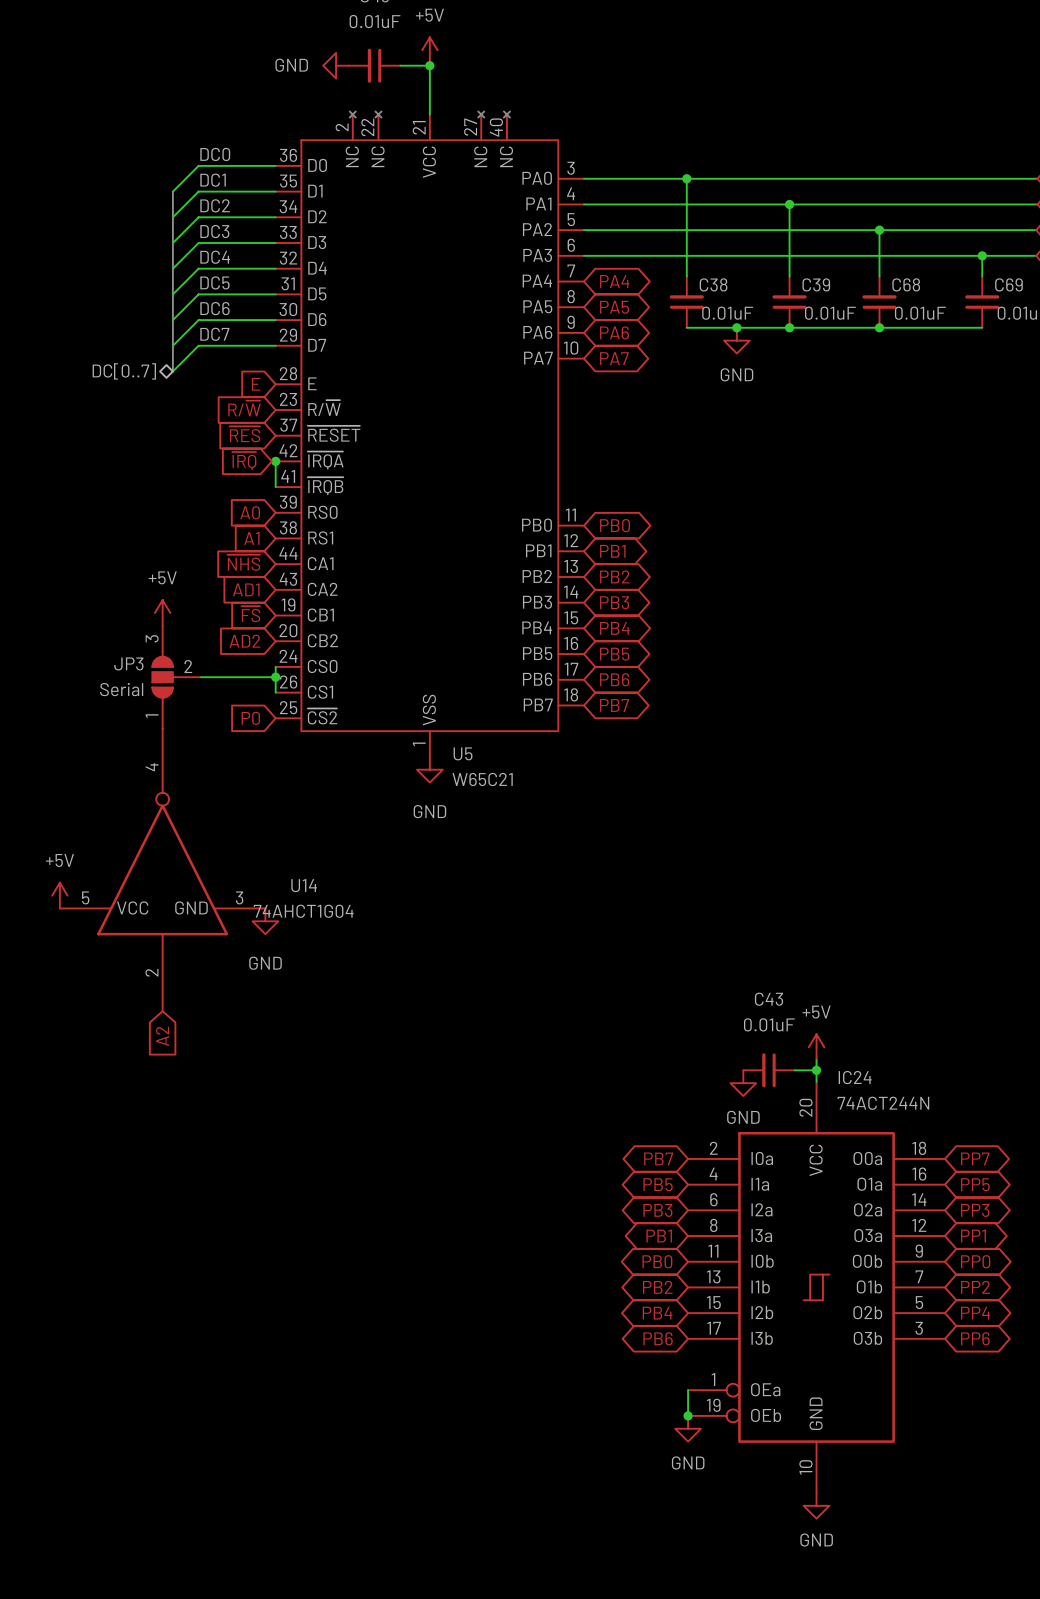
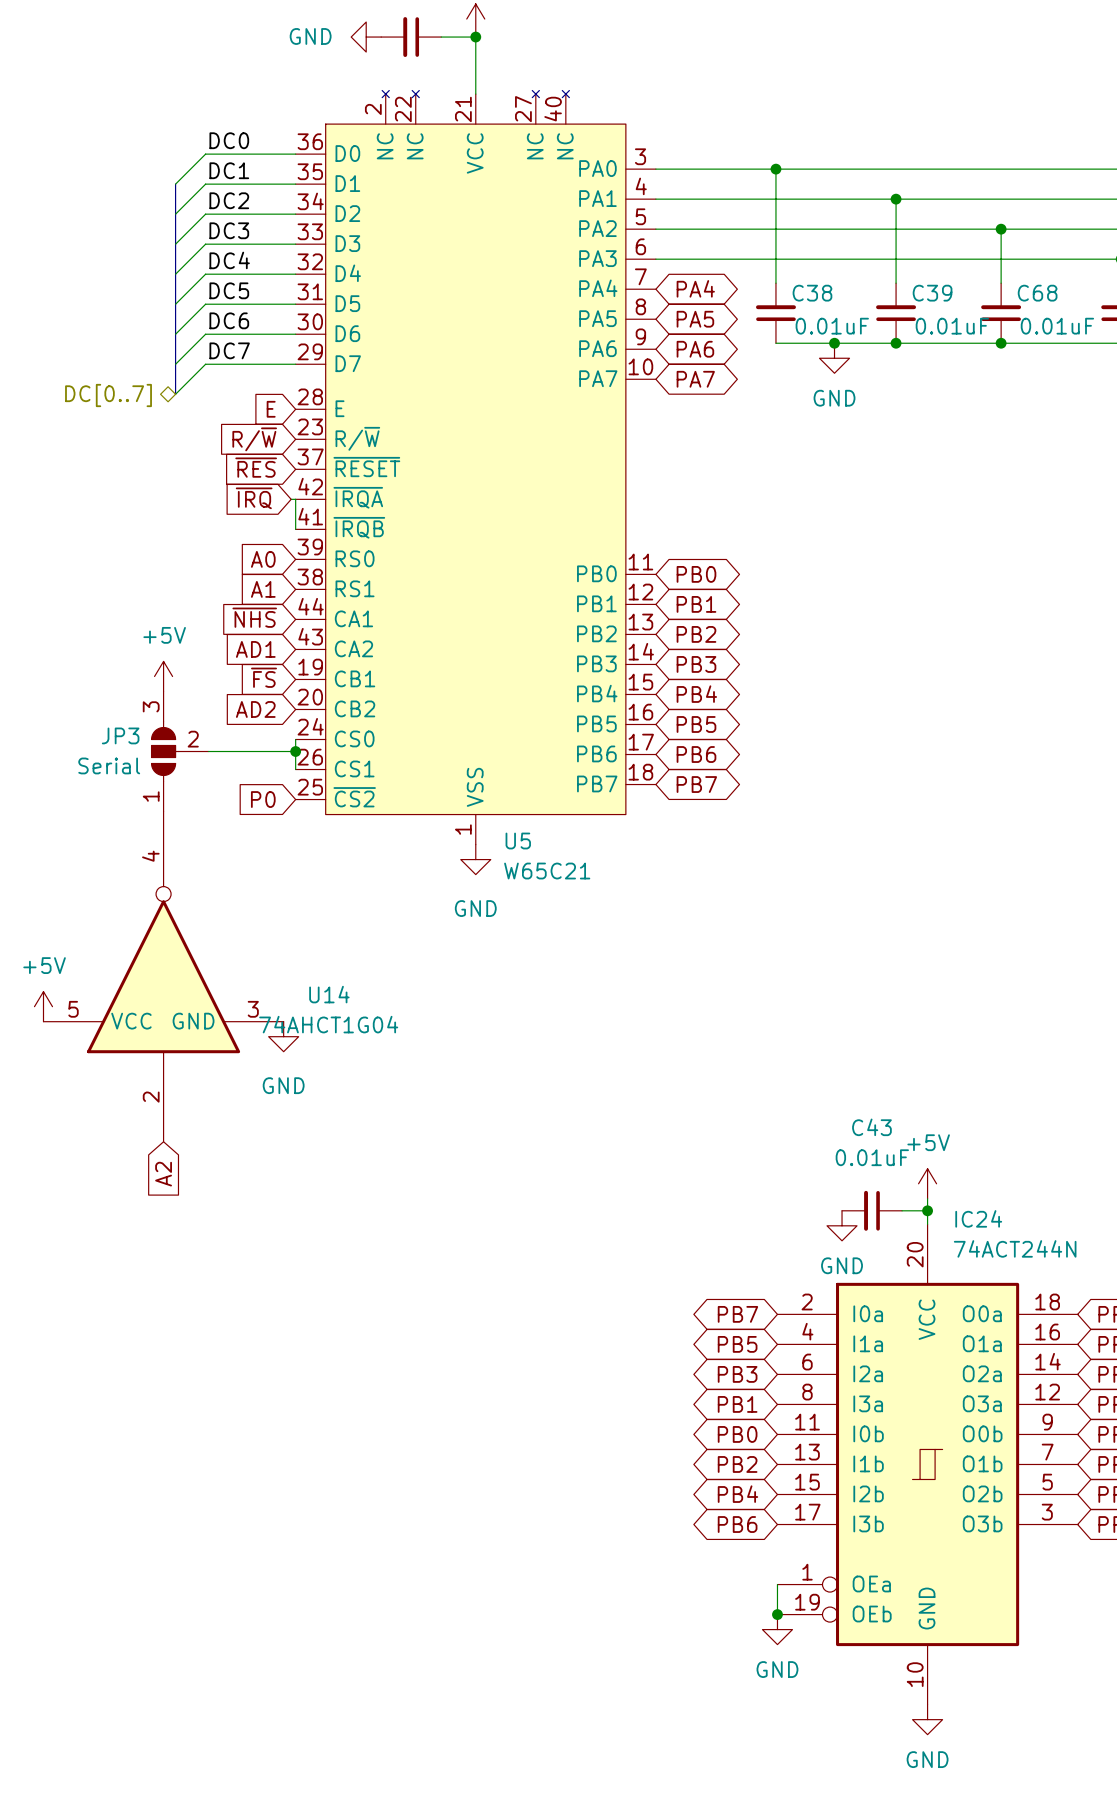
junction: (275, 461) -> none

